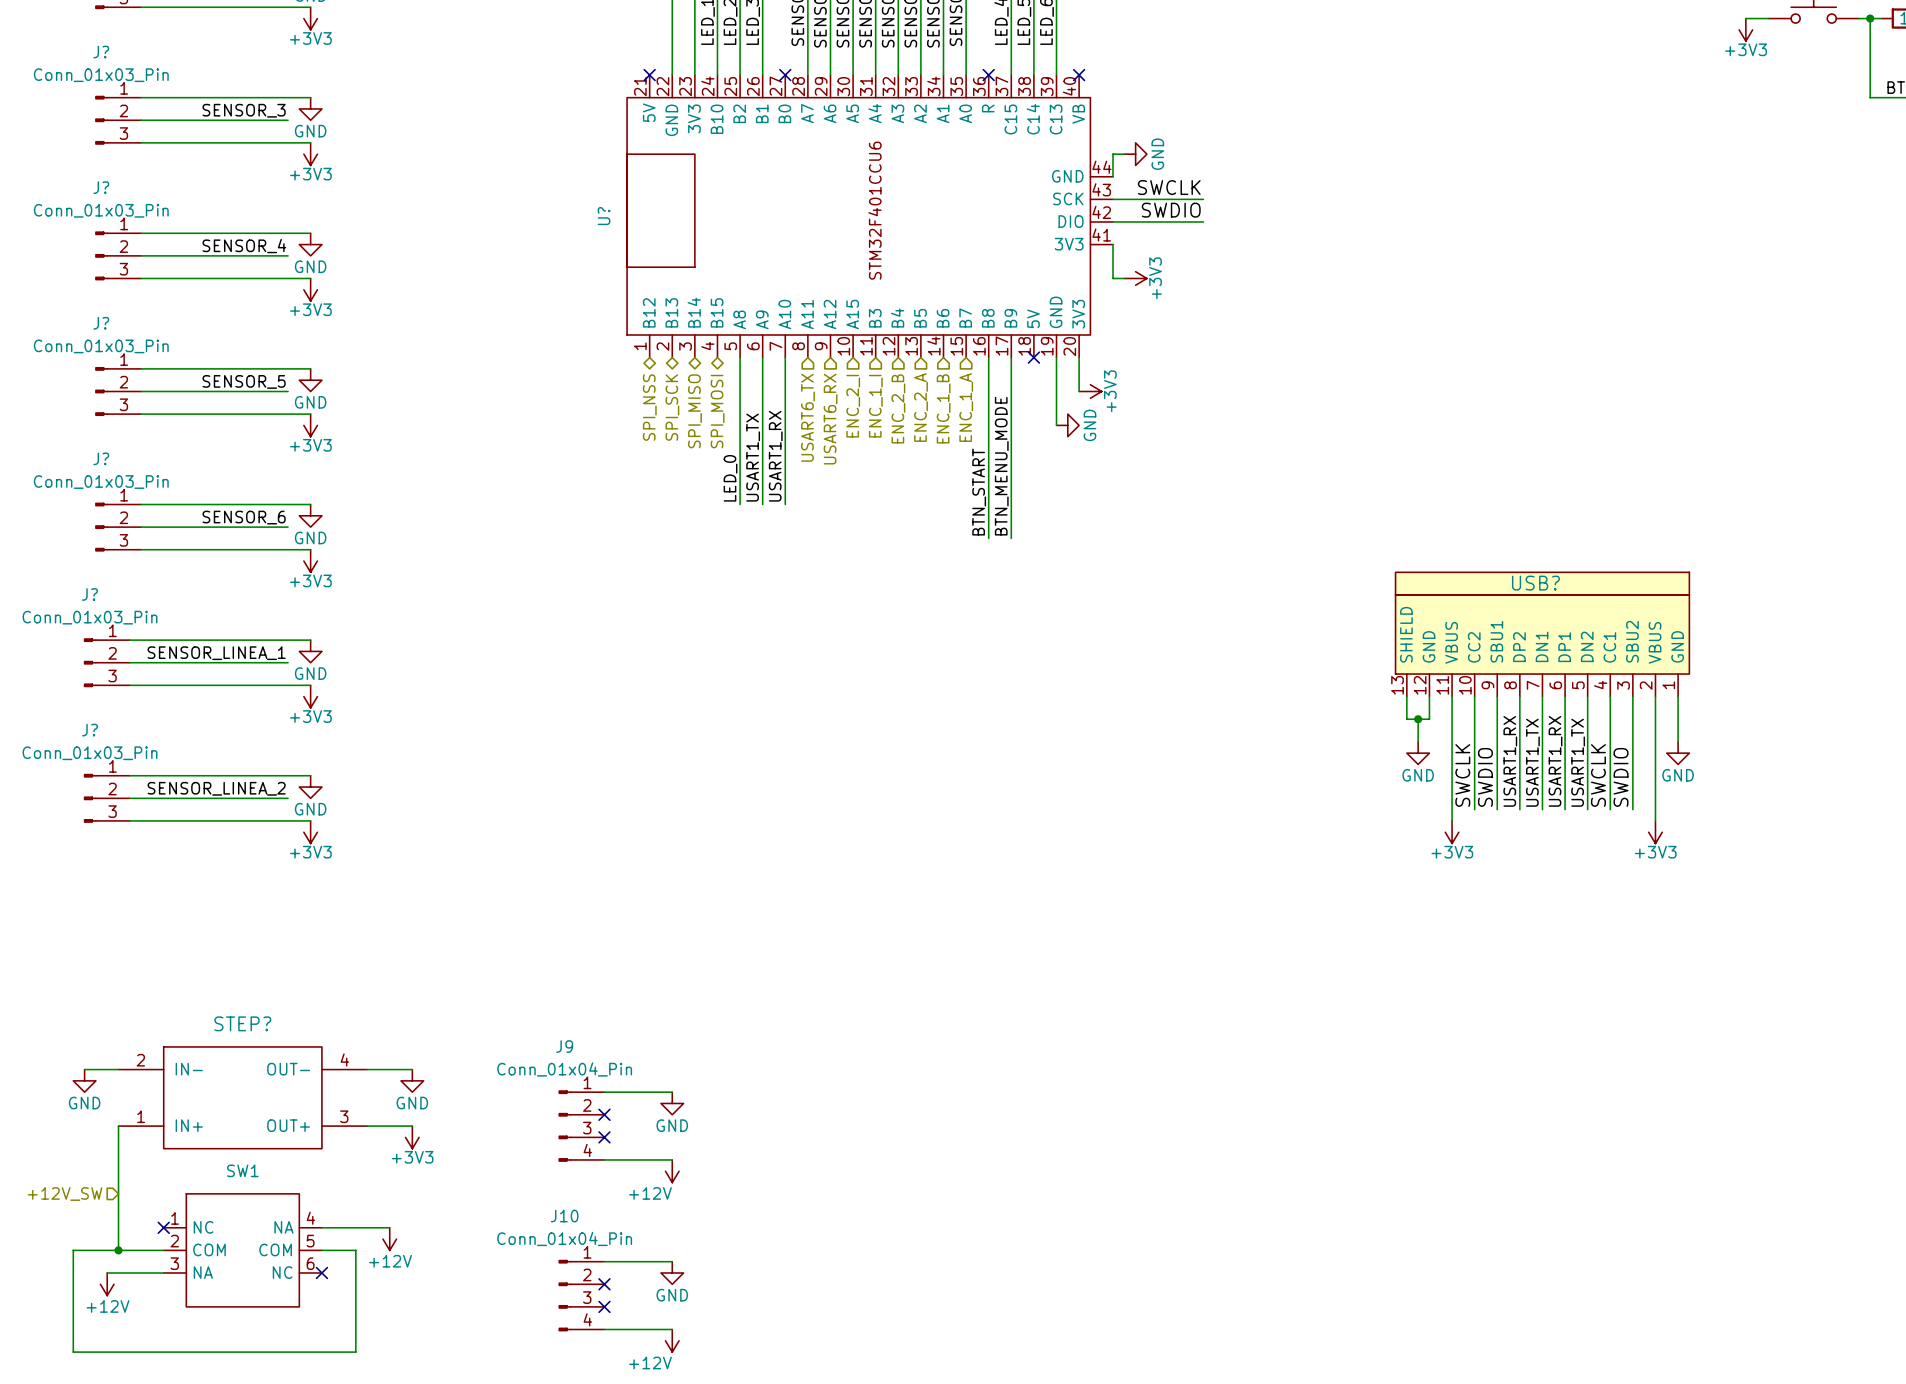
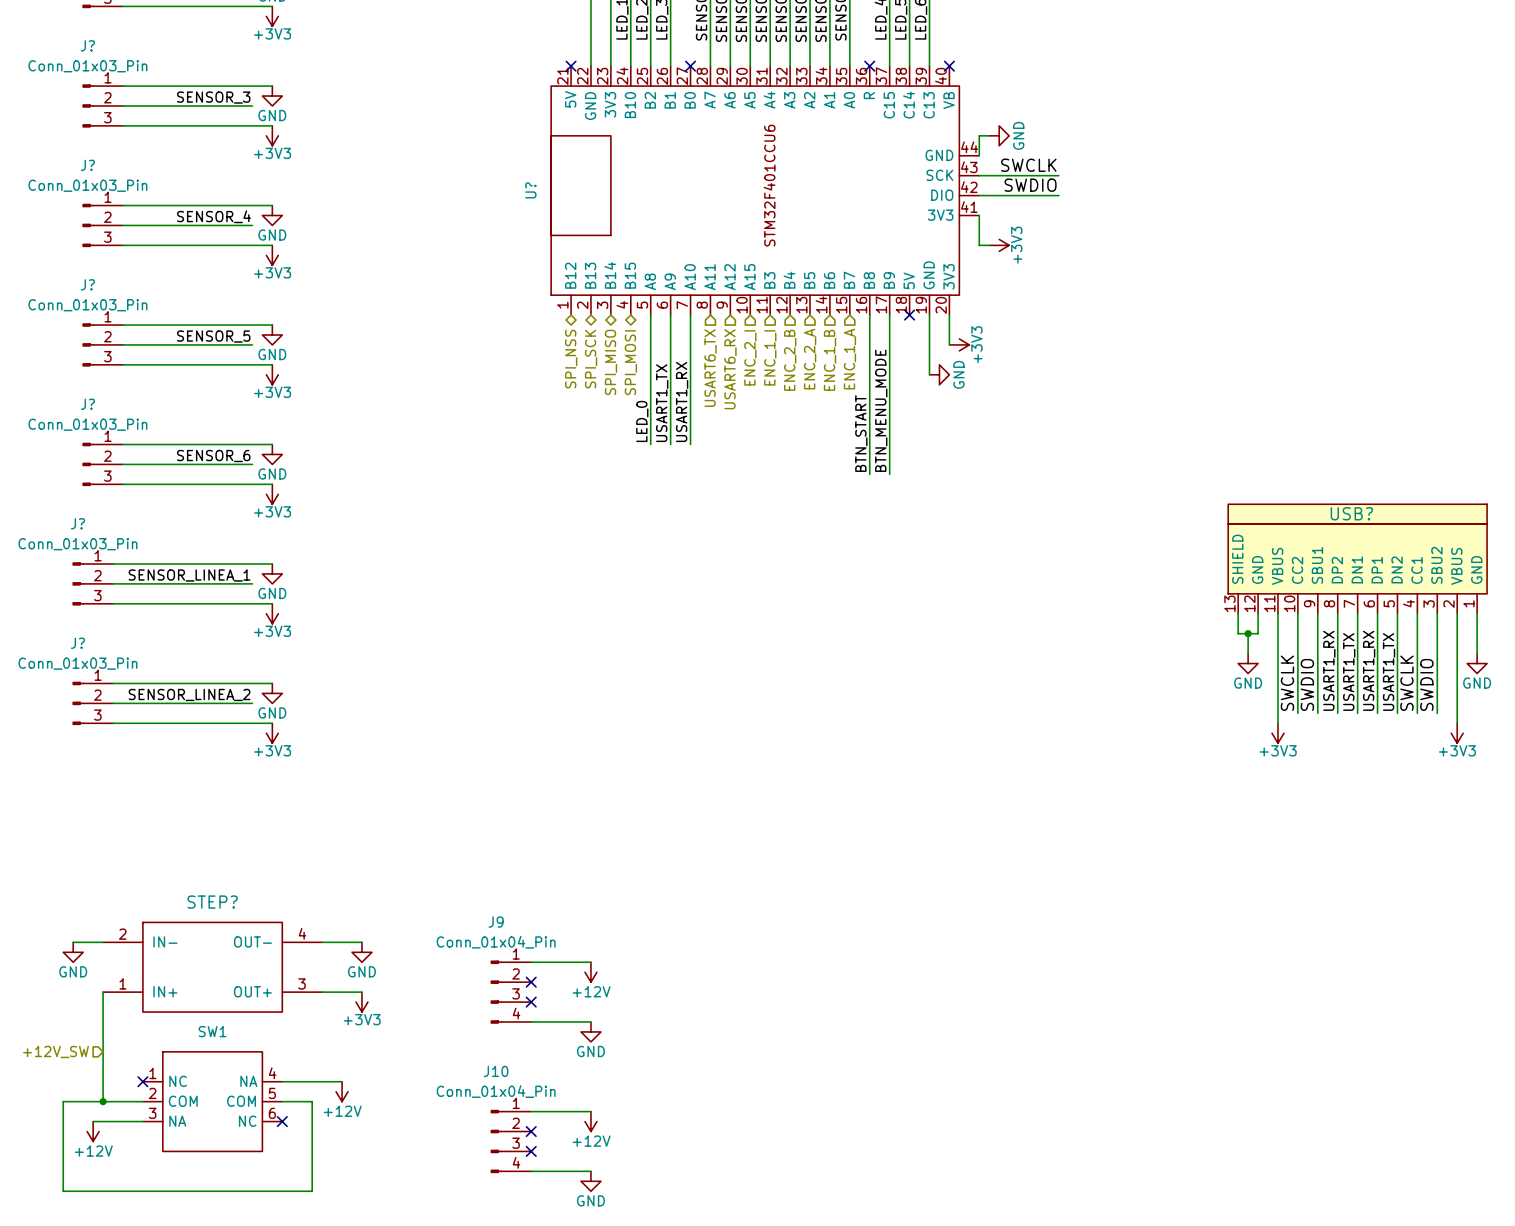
power symbol: GND (672, 1103) -> +12V (590, 972)
power symbol: +12V (672, 1171) -> GND (590, 1031)
power symbol: GND (672, 1272) -> +12V (590, 1121)
power symbol: +12V (672, 1340) -> GND (590, 1181)

